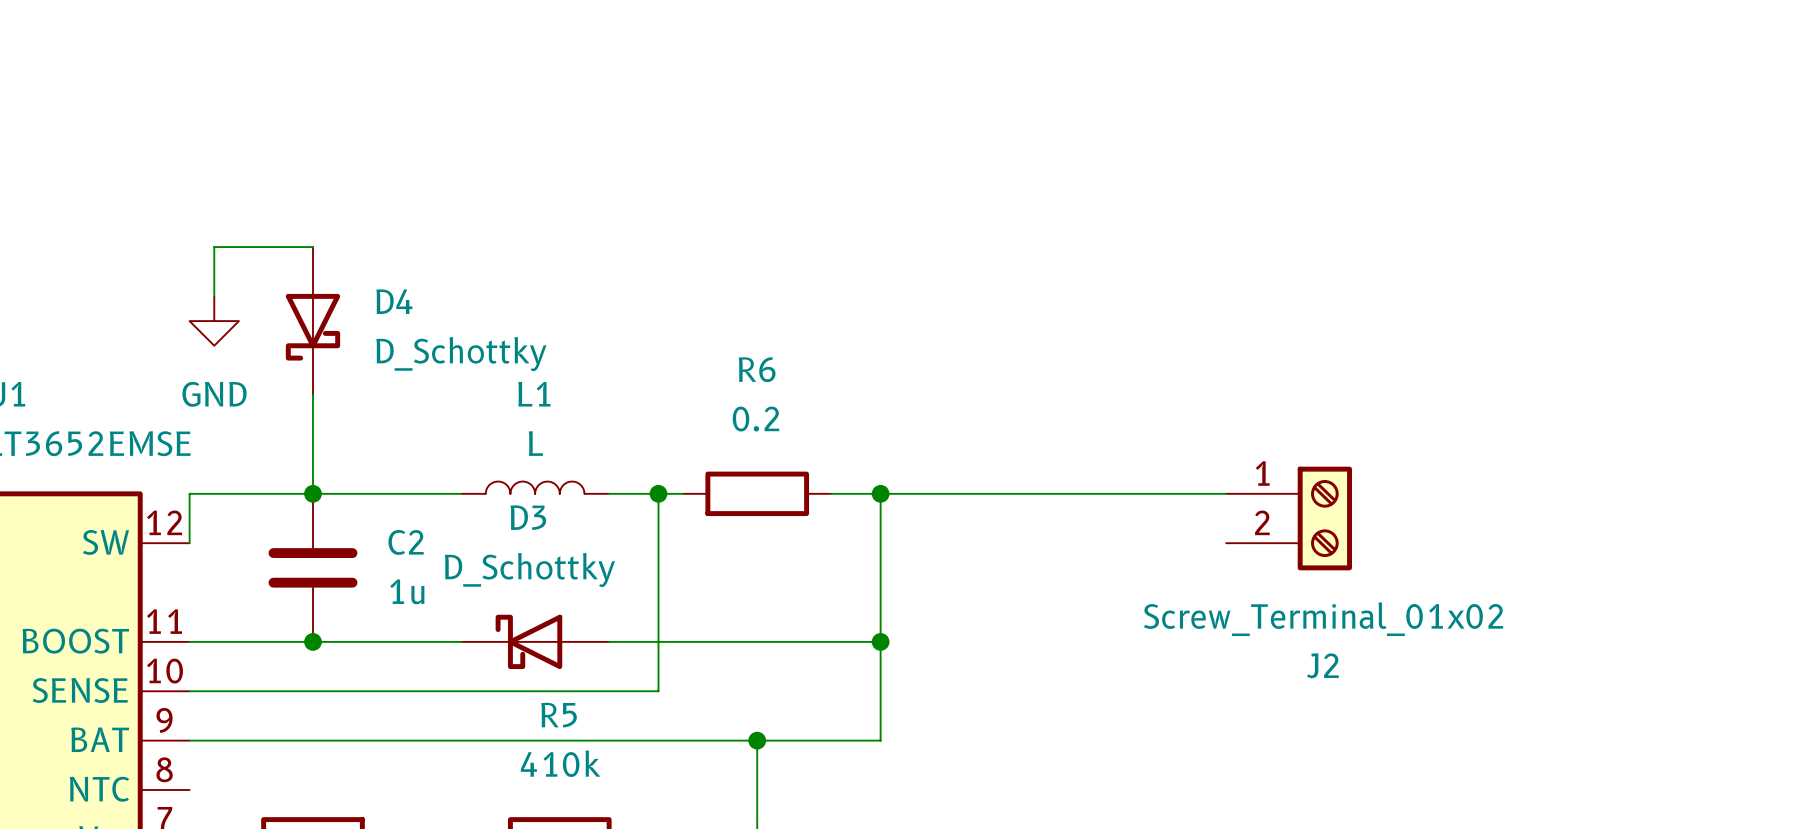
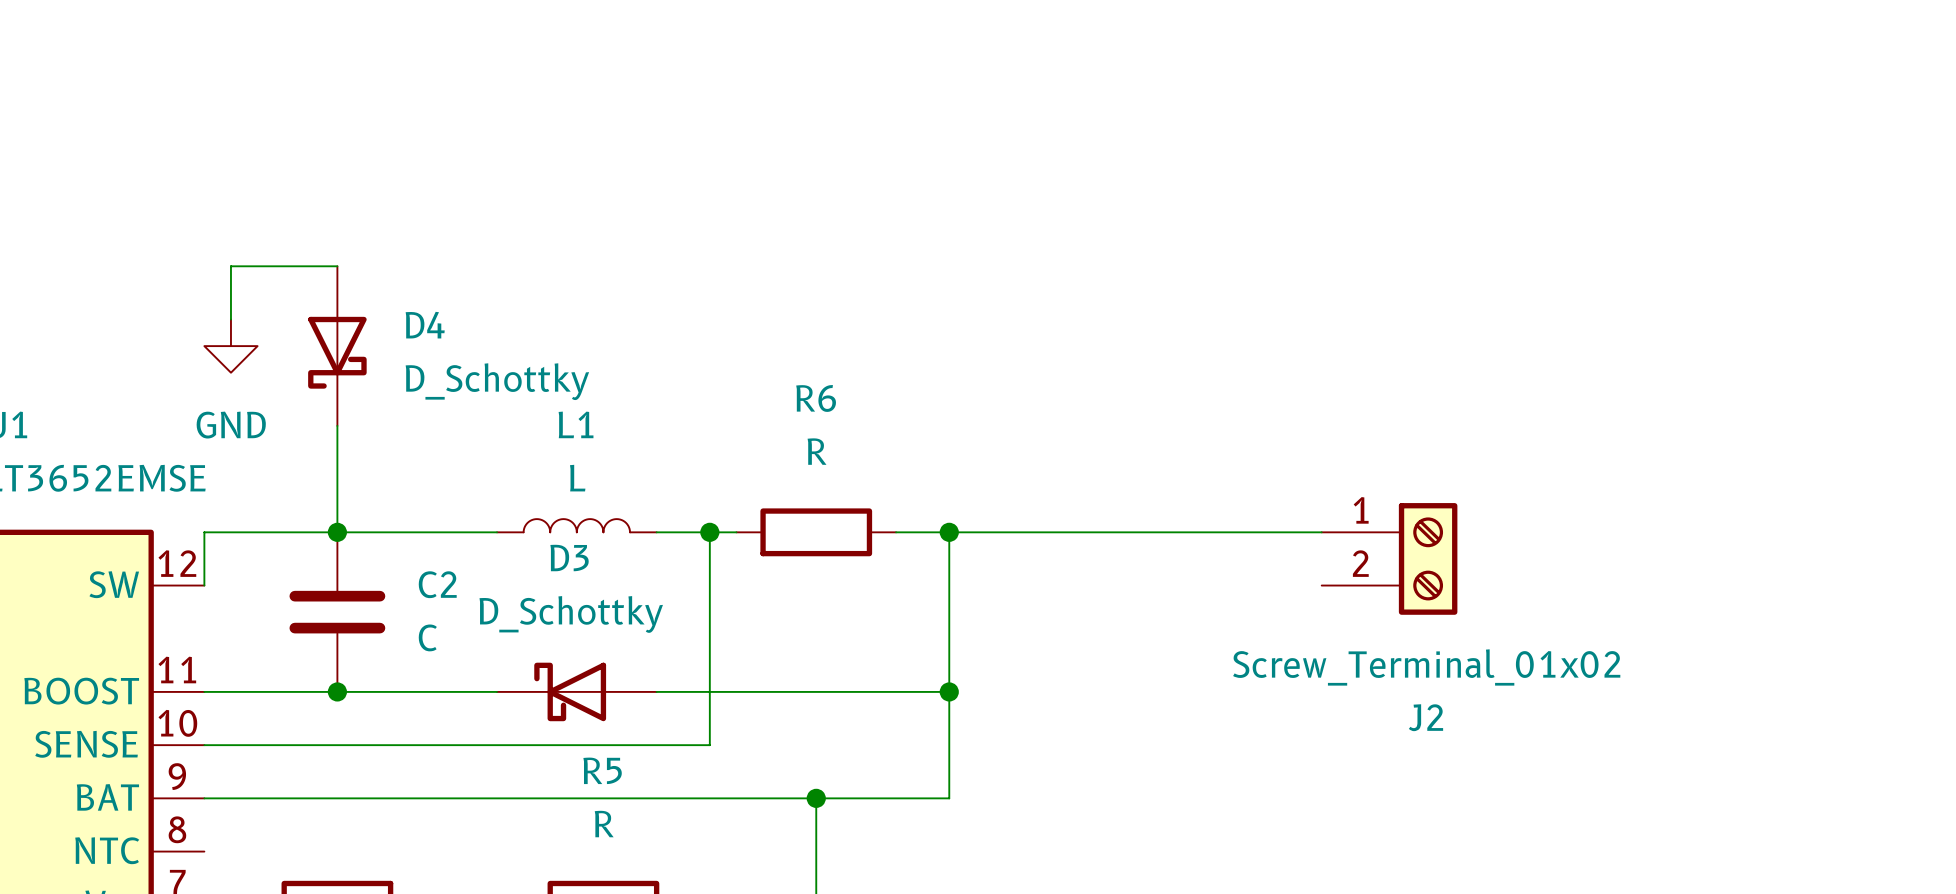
R6 value: 0.2 (755, 419) -> R (817, 451)
C2 value: 1u (407, 591) -> C (427, 637)
R5 value: 410k (560, 763) -> R (604, 824)

